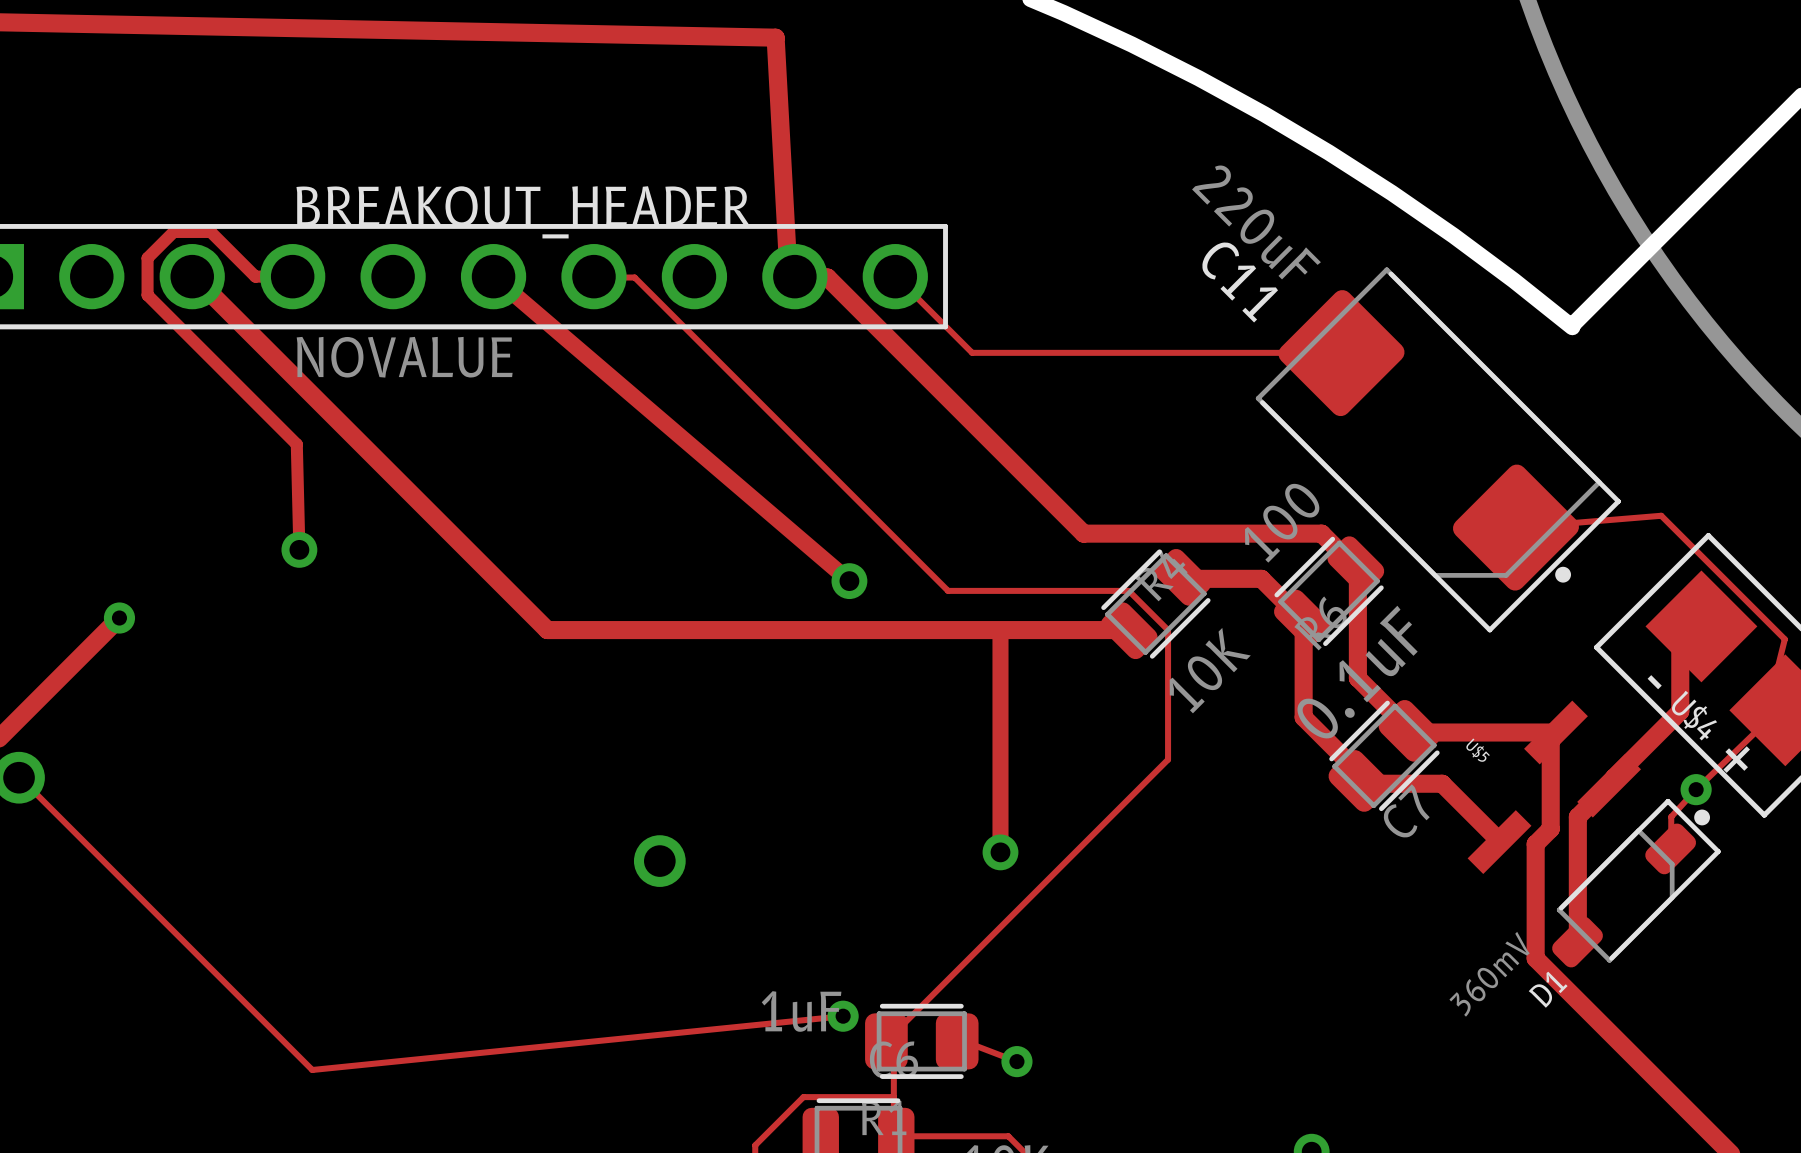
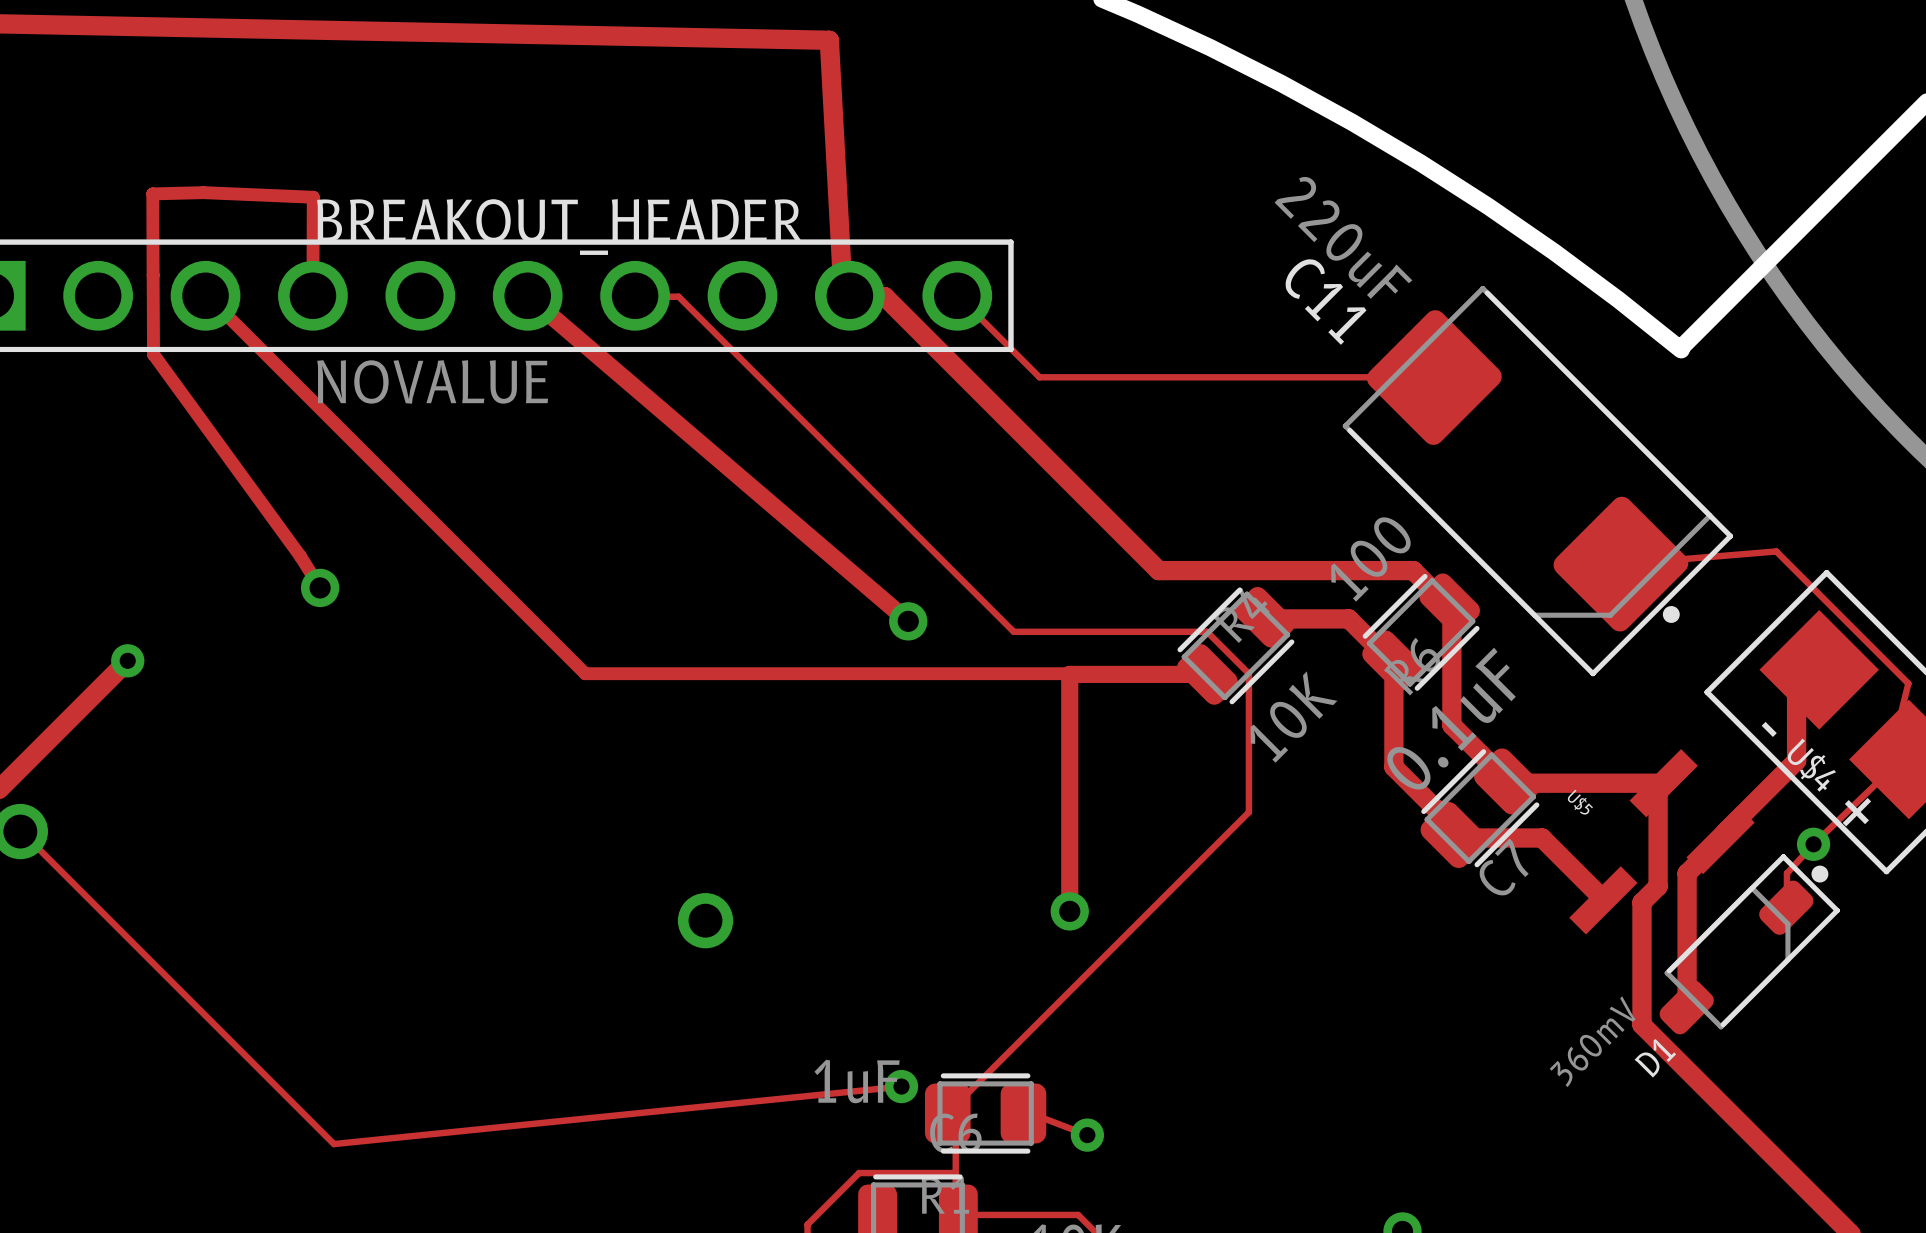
track: (292, 276) (255, 276) (210, 231) (173, 231) (147, 258) (147, 295) (296, 444) (299, 549) -> (312, 295) (313, 197) (203, 192) (152, 193) (153, 354) (300, 556) (320, 587)
track width: thick (194, 277) (547, 630) (1128, 630) -> thin (208, 296) (585, 673) (1207, 673)

